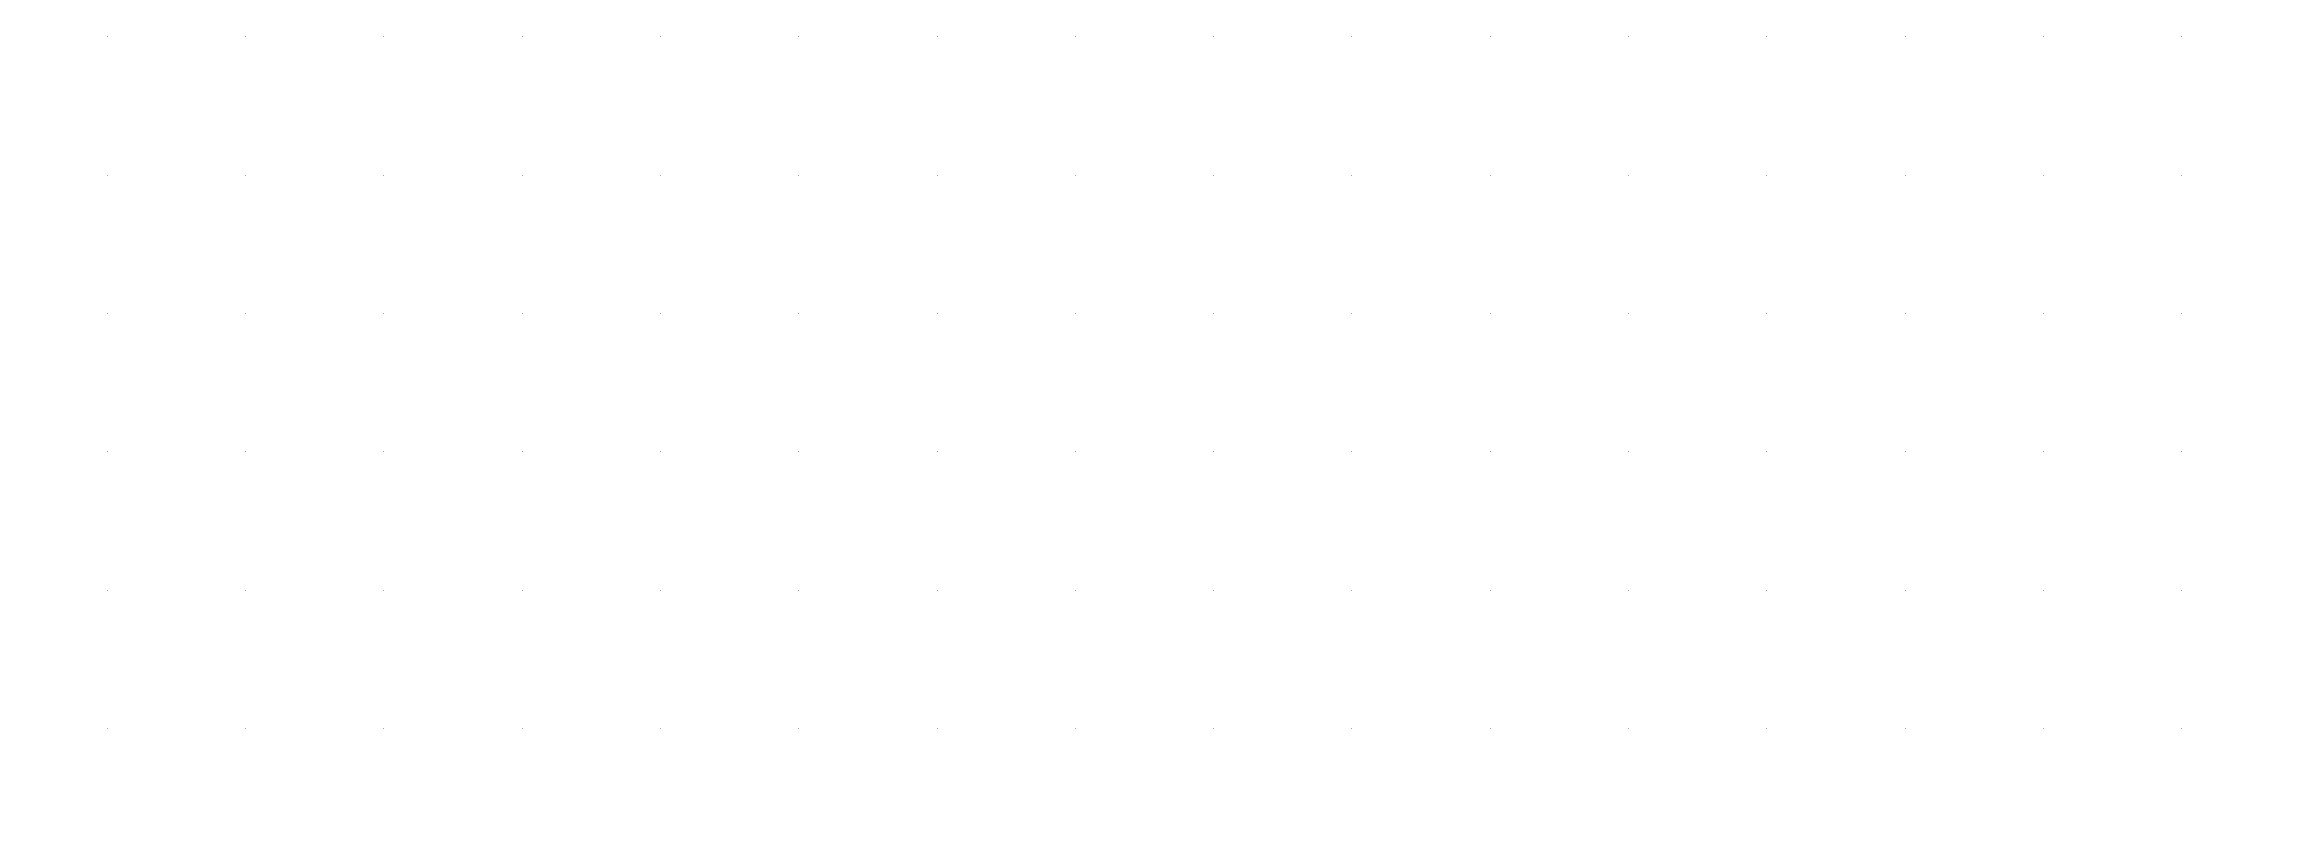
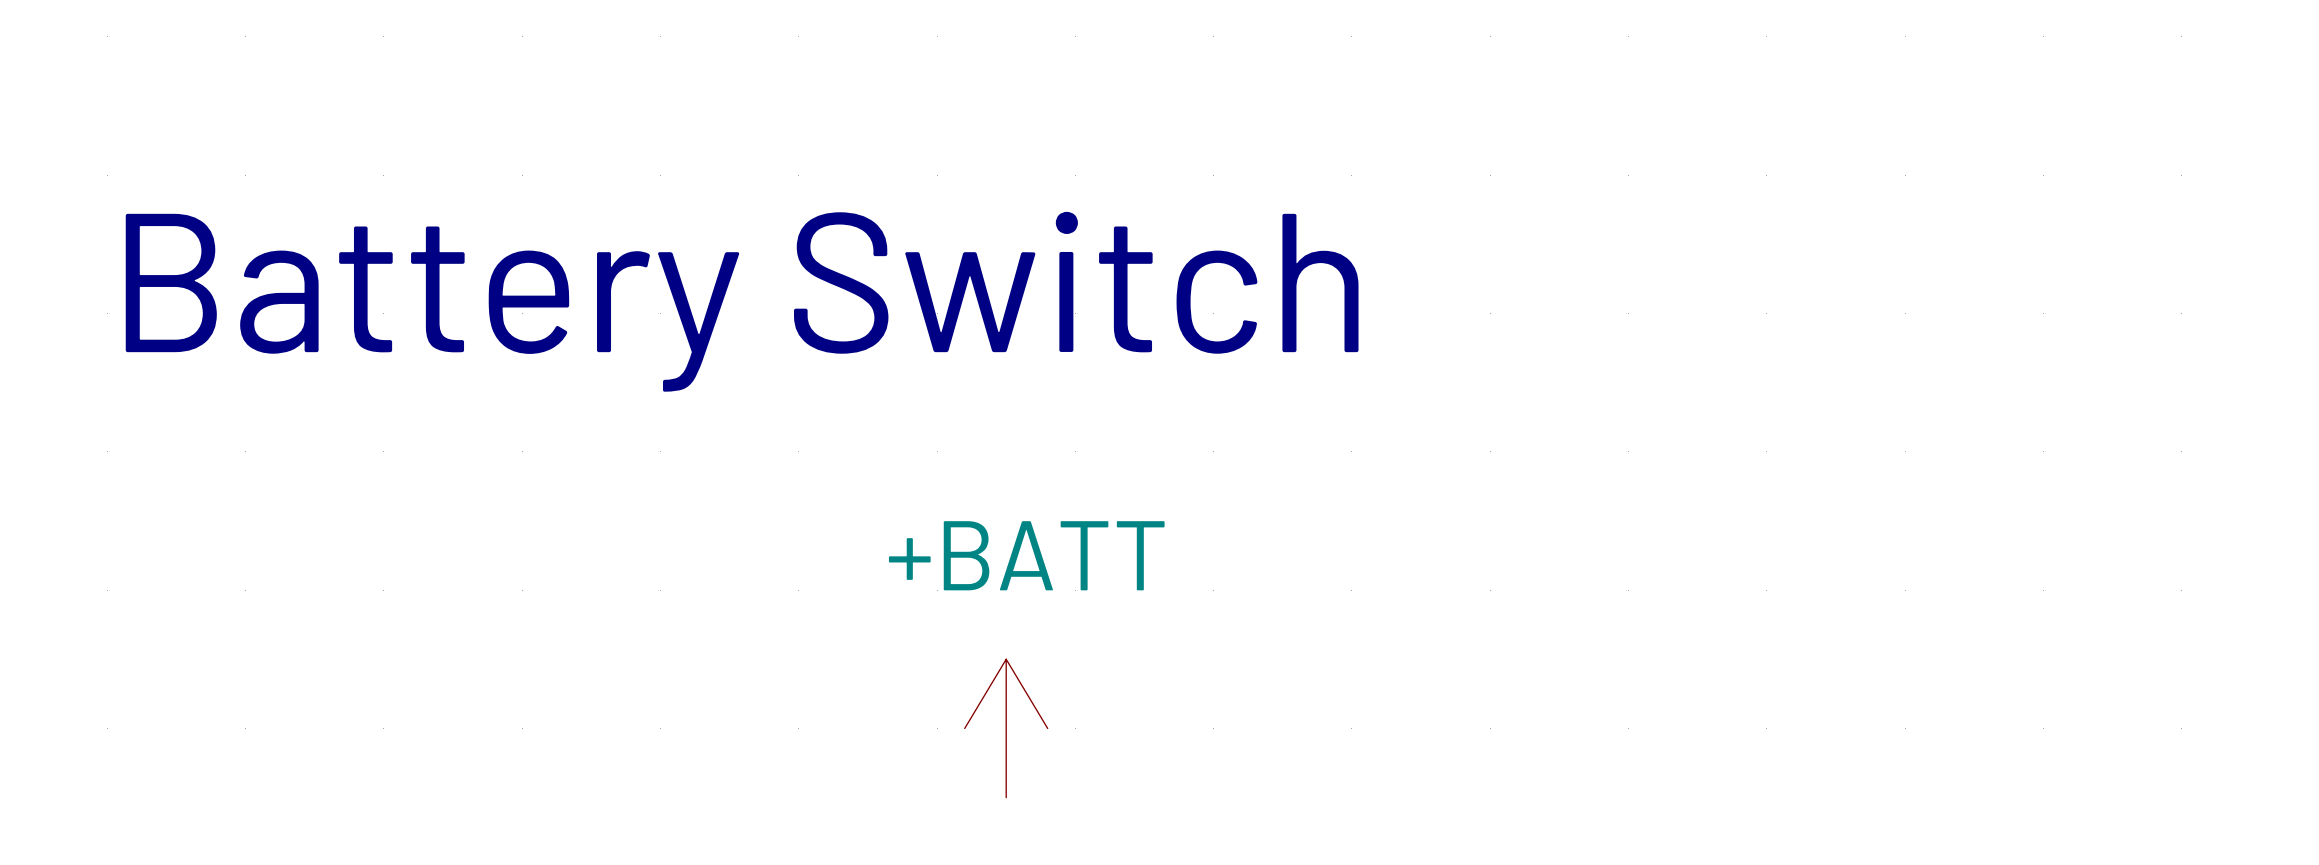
text: none -> Battery Switch (742, 301)
power symbol: none -> +BATT (1006, 728)

